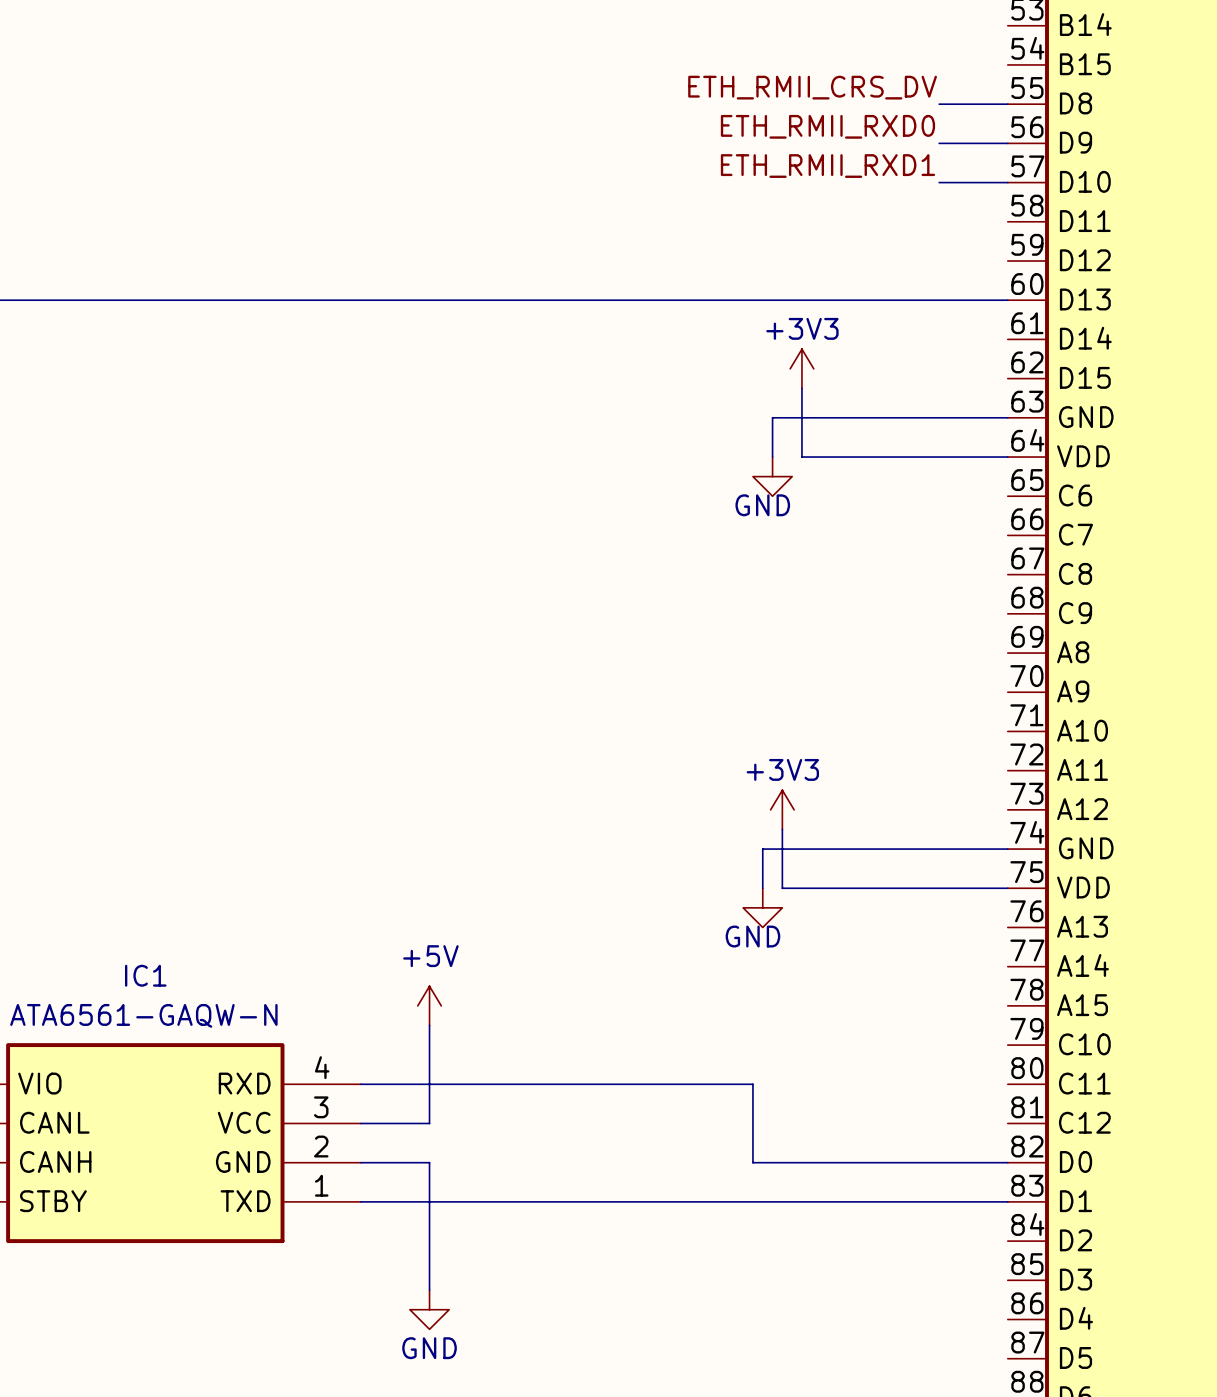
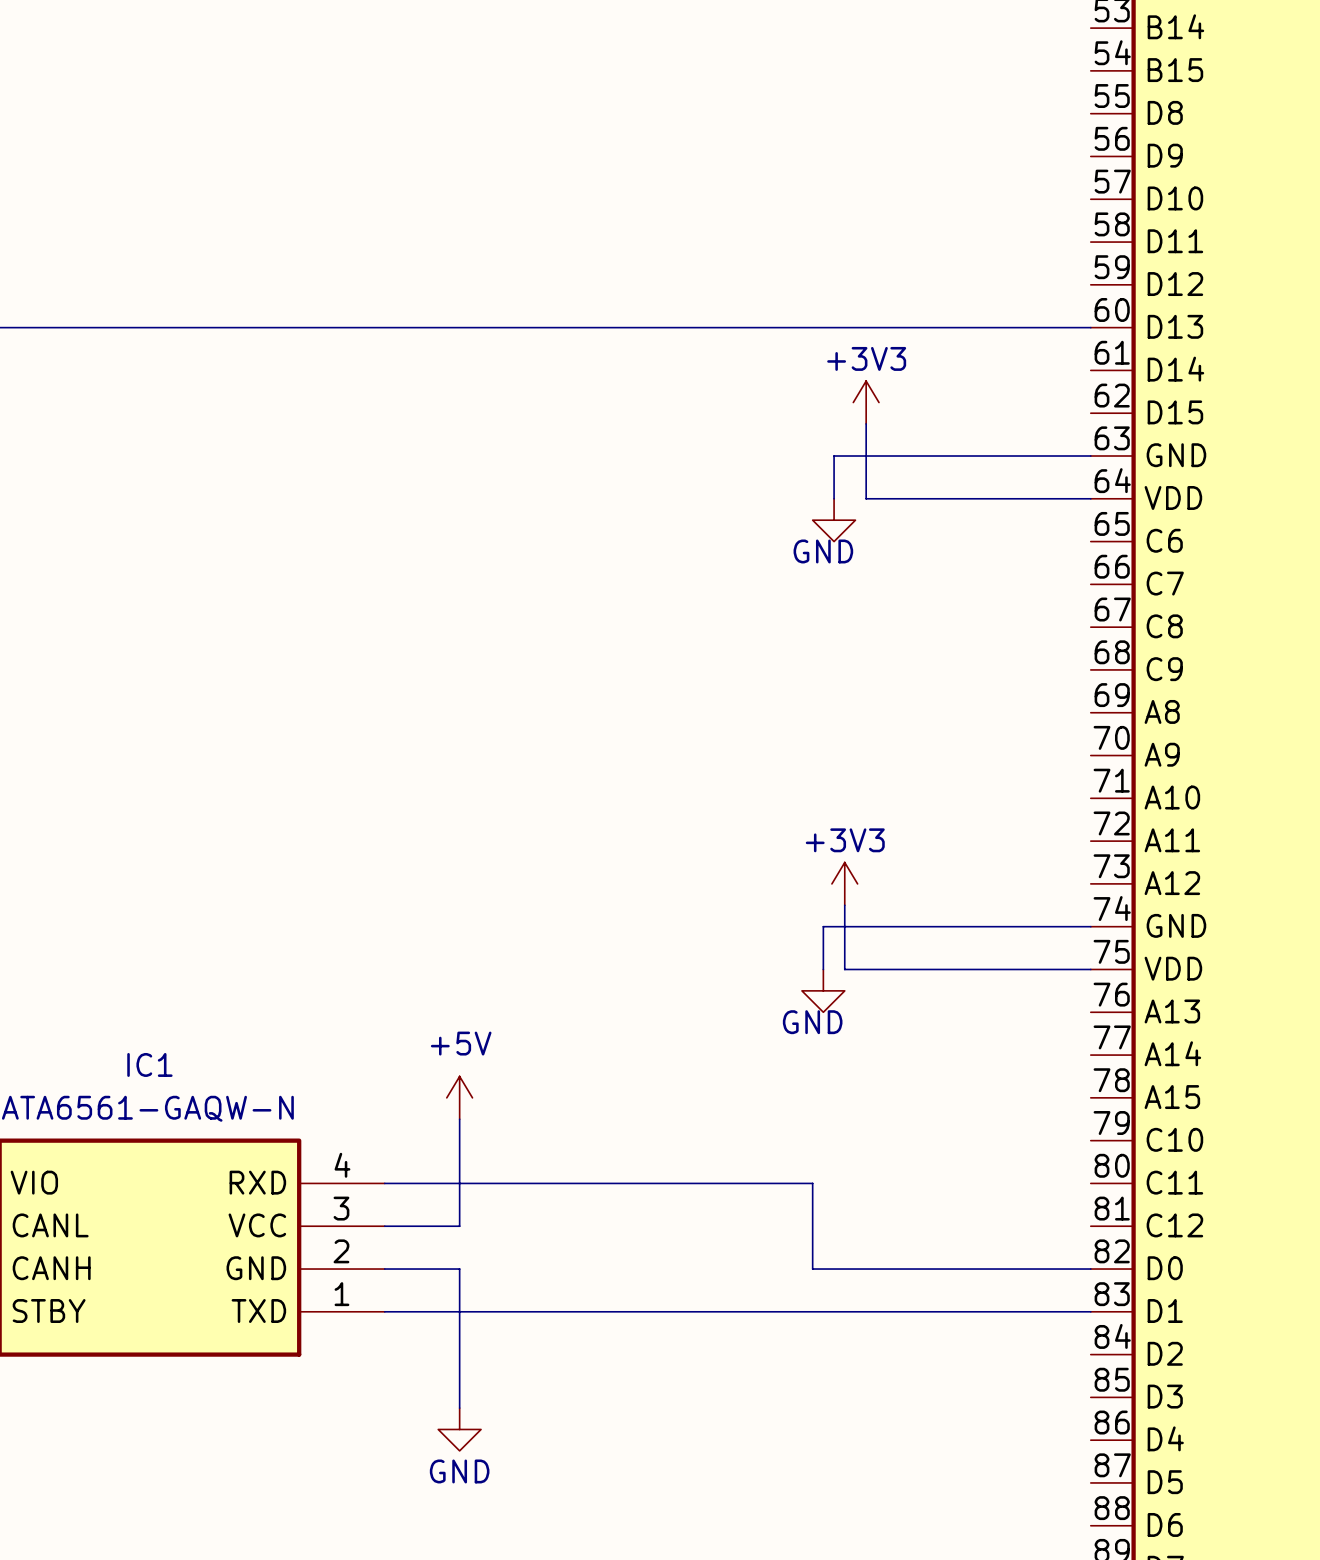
label: ETH_RMII_CRS_DV (812, 87) -> none
wire: (939, 104) (1007, 104) -> none
label: ETH_RMII_RXD0 (827, 126) -> none
wire: (939, 143) (1007, 143) -> none
label: ETH_RMII_RXD1 (827, 166) -> none
wire: (939, 182) (1007, 182) -> none

